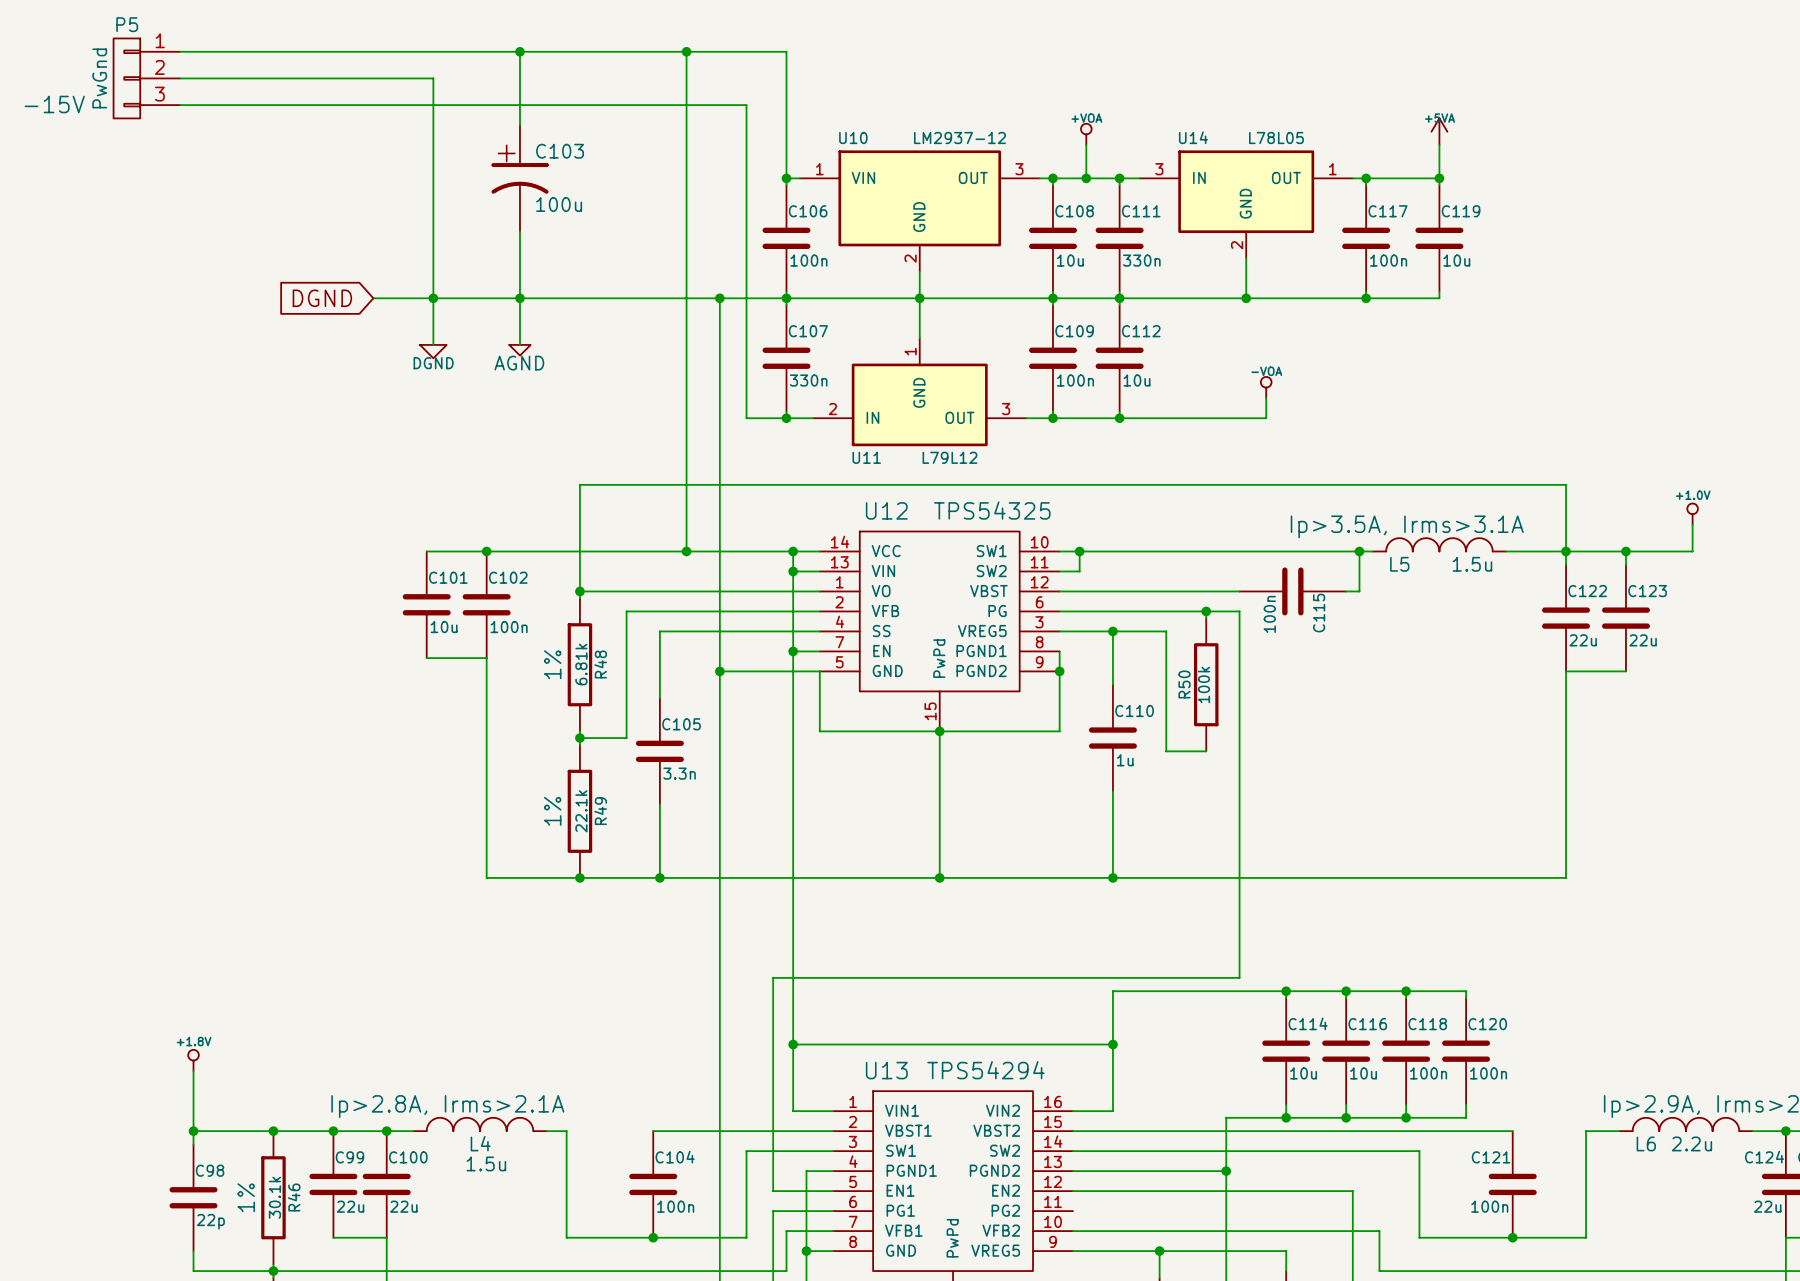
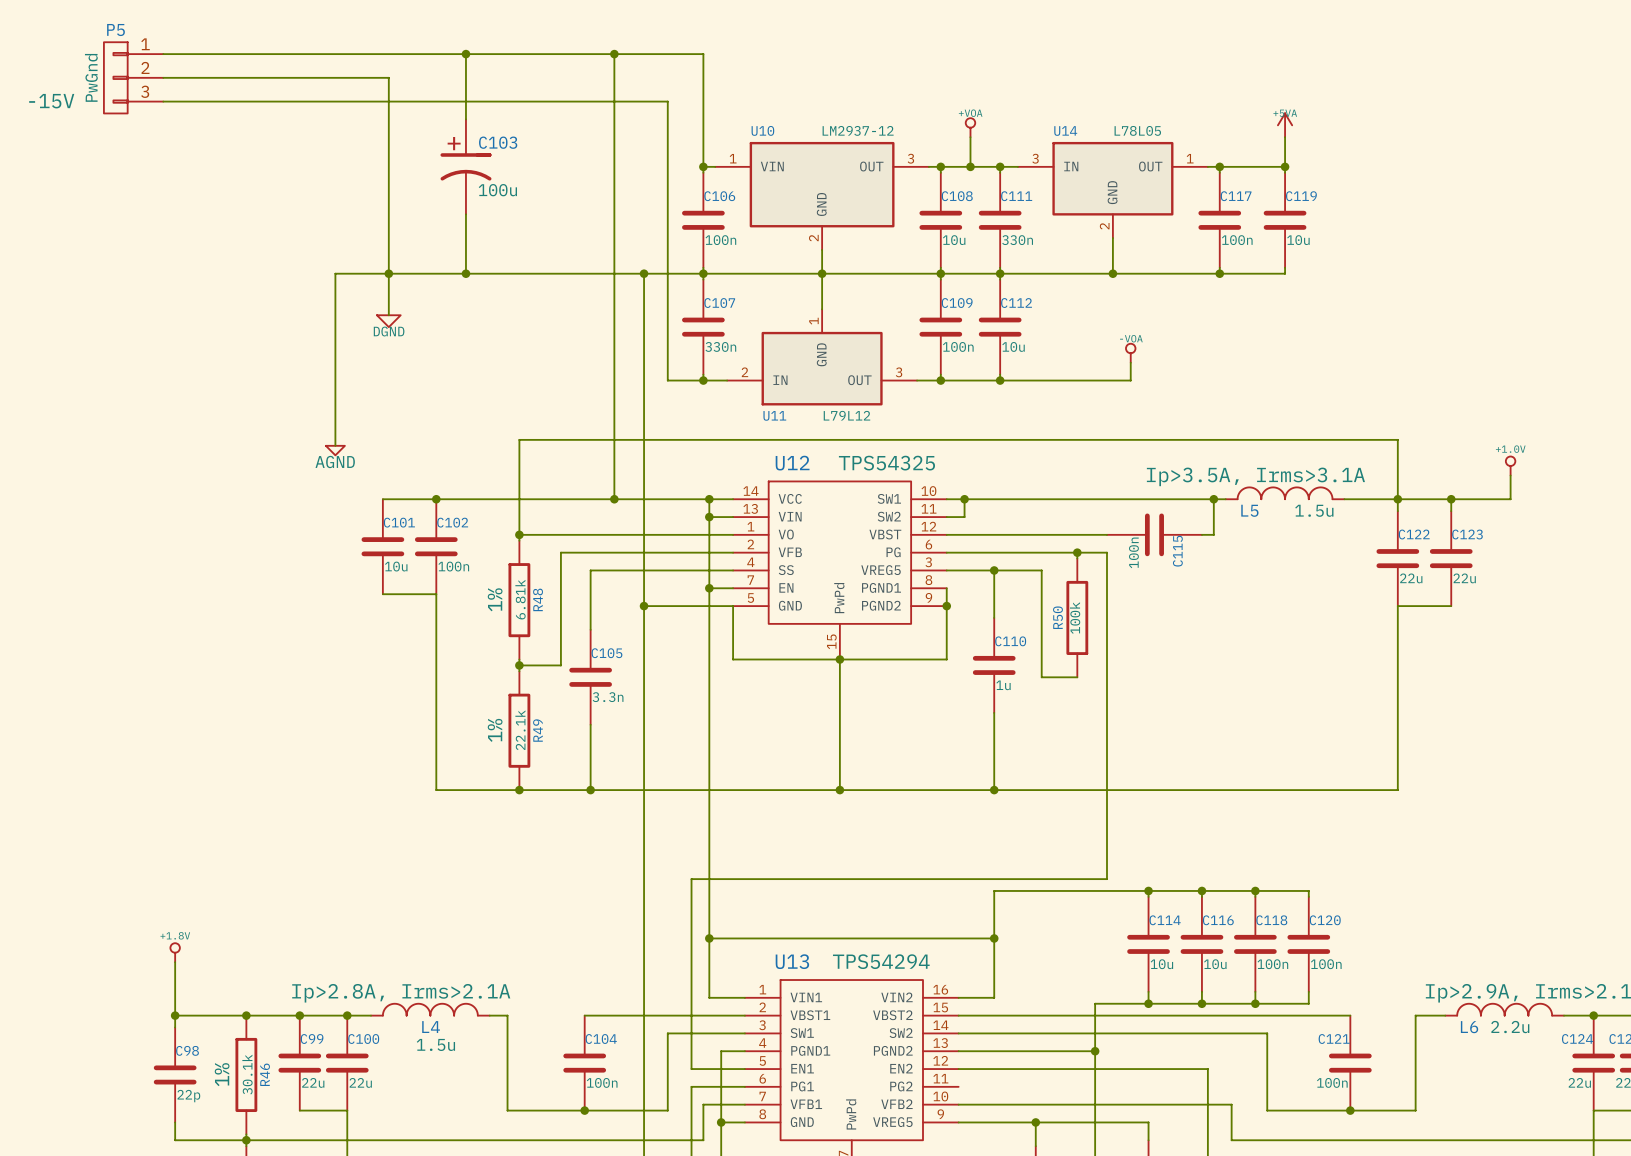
global label: DGND (322, 298) -> none
wire: none -> (335, 273) (335, 445)
wire: (519, 298) (519, 344) -> none
power symbol position: AGND (519, 350) -> AGND (335, 450)

